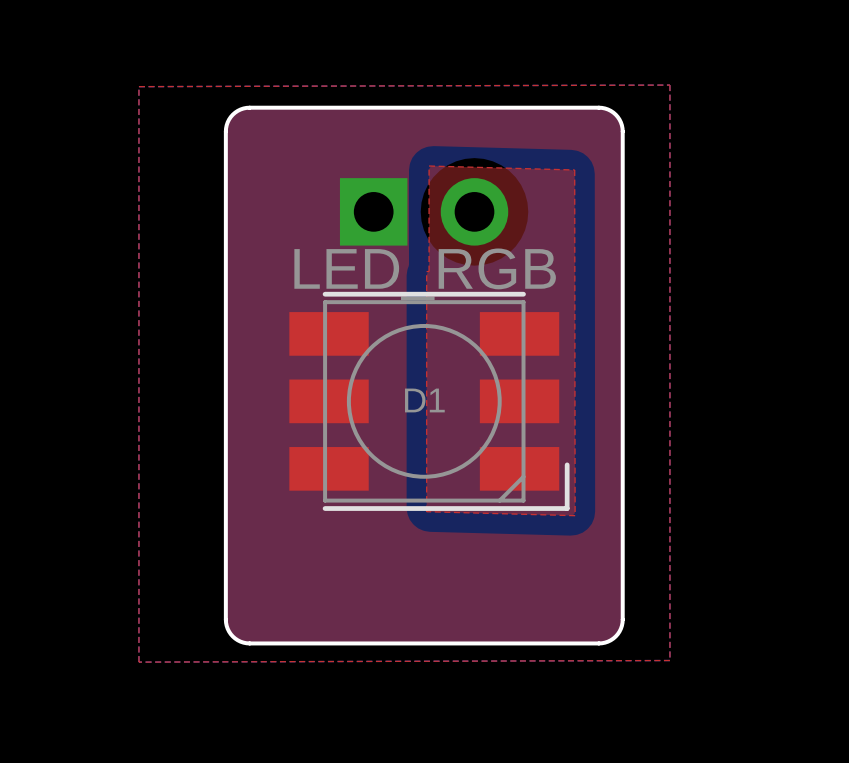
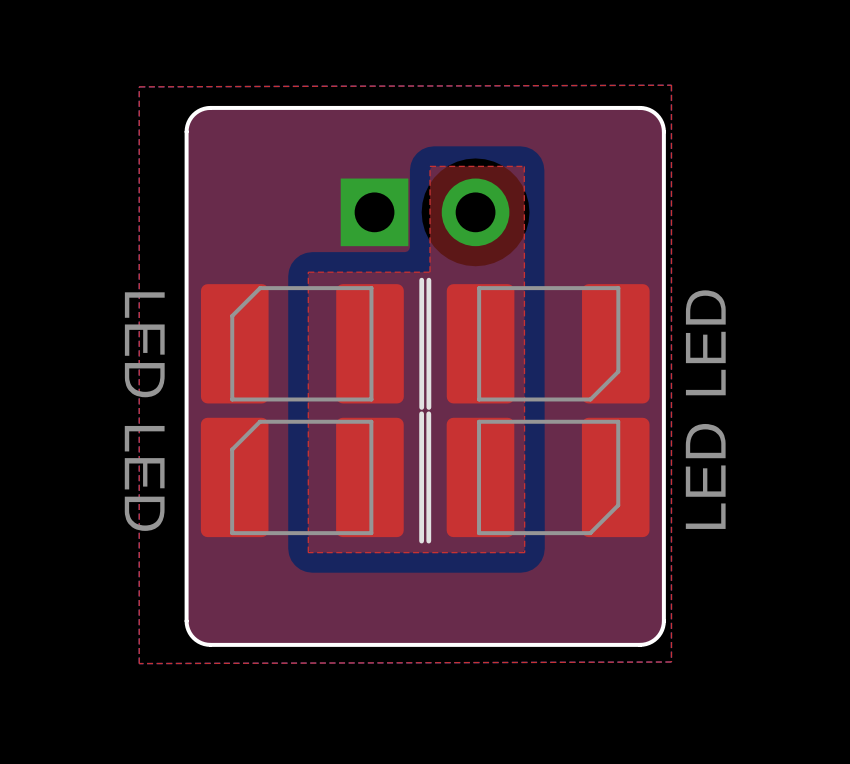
board edge: (249, 107) (240, 109) (232, 114) (227, 122) (225, 131) (225, 619) (227, 628) (232, 636) (240, 641) (249, 643) -> (250, 107) (201, 109) (189, 119) (186, 131) (186, 624) (191, 635) (204, 644) (250, 644)
board edge: (598, 107) (608, 109) (615, 114) (620, 122) (622, 131) (622, 619) (620, 628) (615, 636) (608, 641) (598, 643) -> (600, 107) (649, 109) (660, 119) (663, 131) (663, 624) (658, 635) (646, 644) (600, 644)
top zone outline: (429, 166) (574, 170) (575, 515) (426, 511) (426, 271) -> (430, 166) (524, 166) (524, 552) (308, 552) (308, 272) (427, 272)
part: none -> LED (312, 343)
part: none -> LED (538, 343)
D1: LED_RGB (429, 401) -> none
part: none -> LED (312, 477)
part: none -> LED (537, 477)

